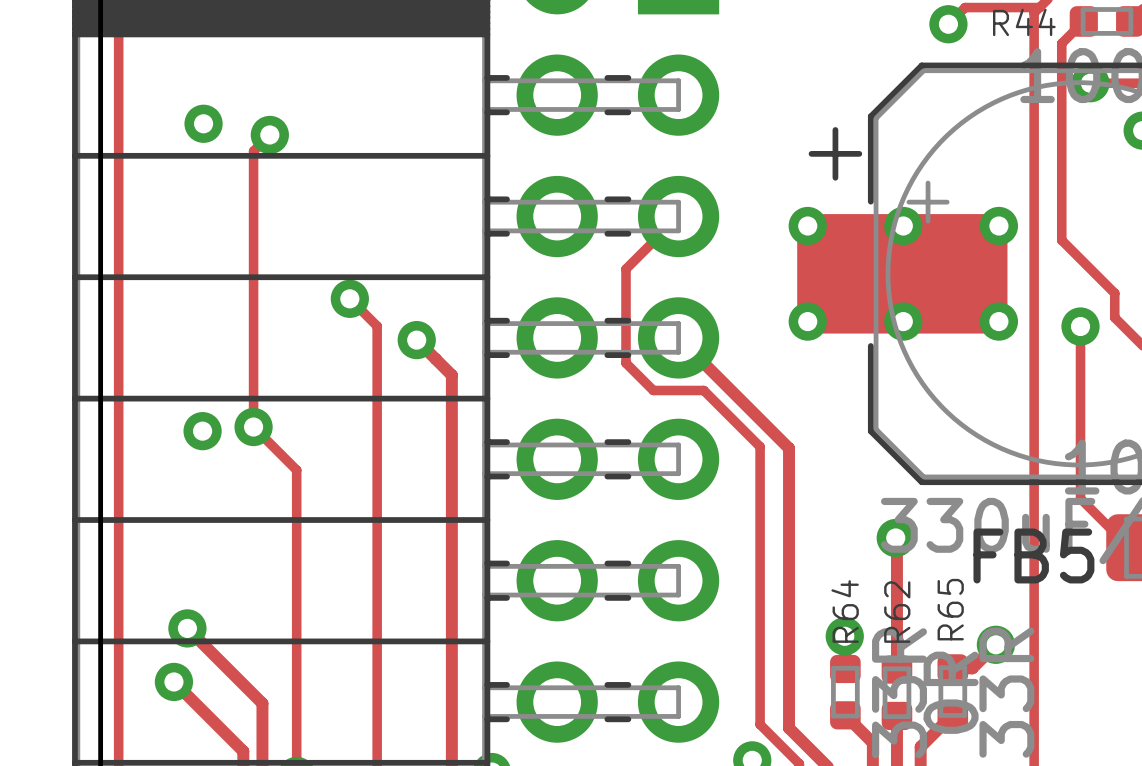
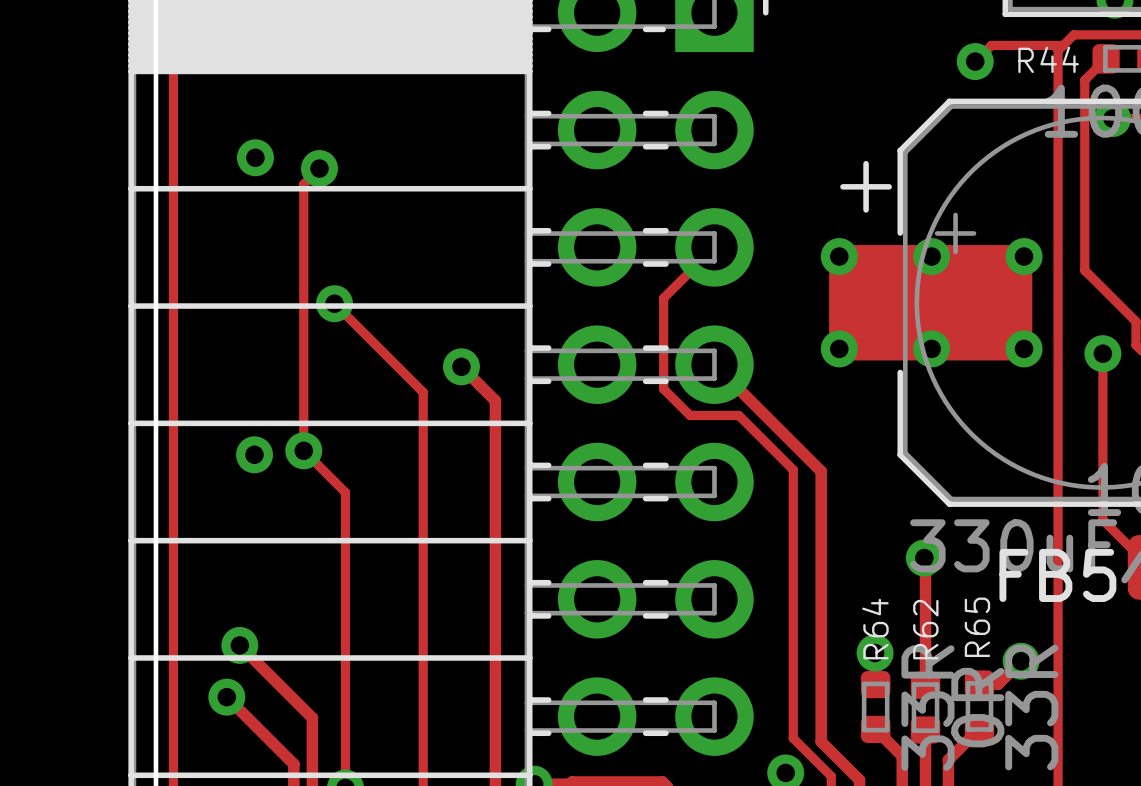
track: (349, 298) (377, 326) (377, 366) -> (334, 303) (423, 392)
via position: (349, 298) -> (334, 303)

